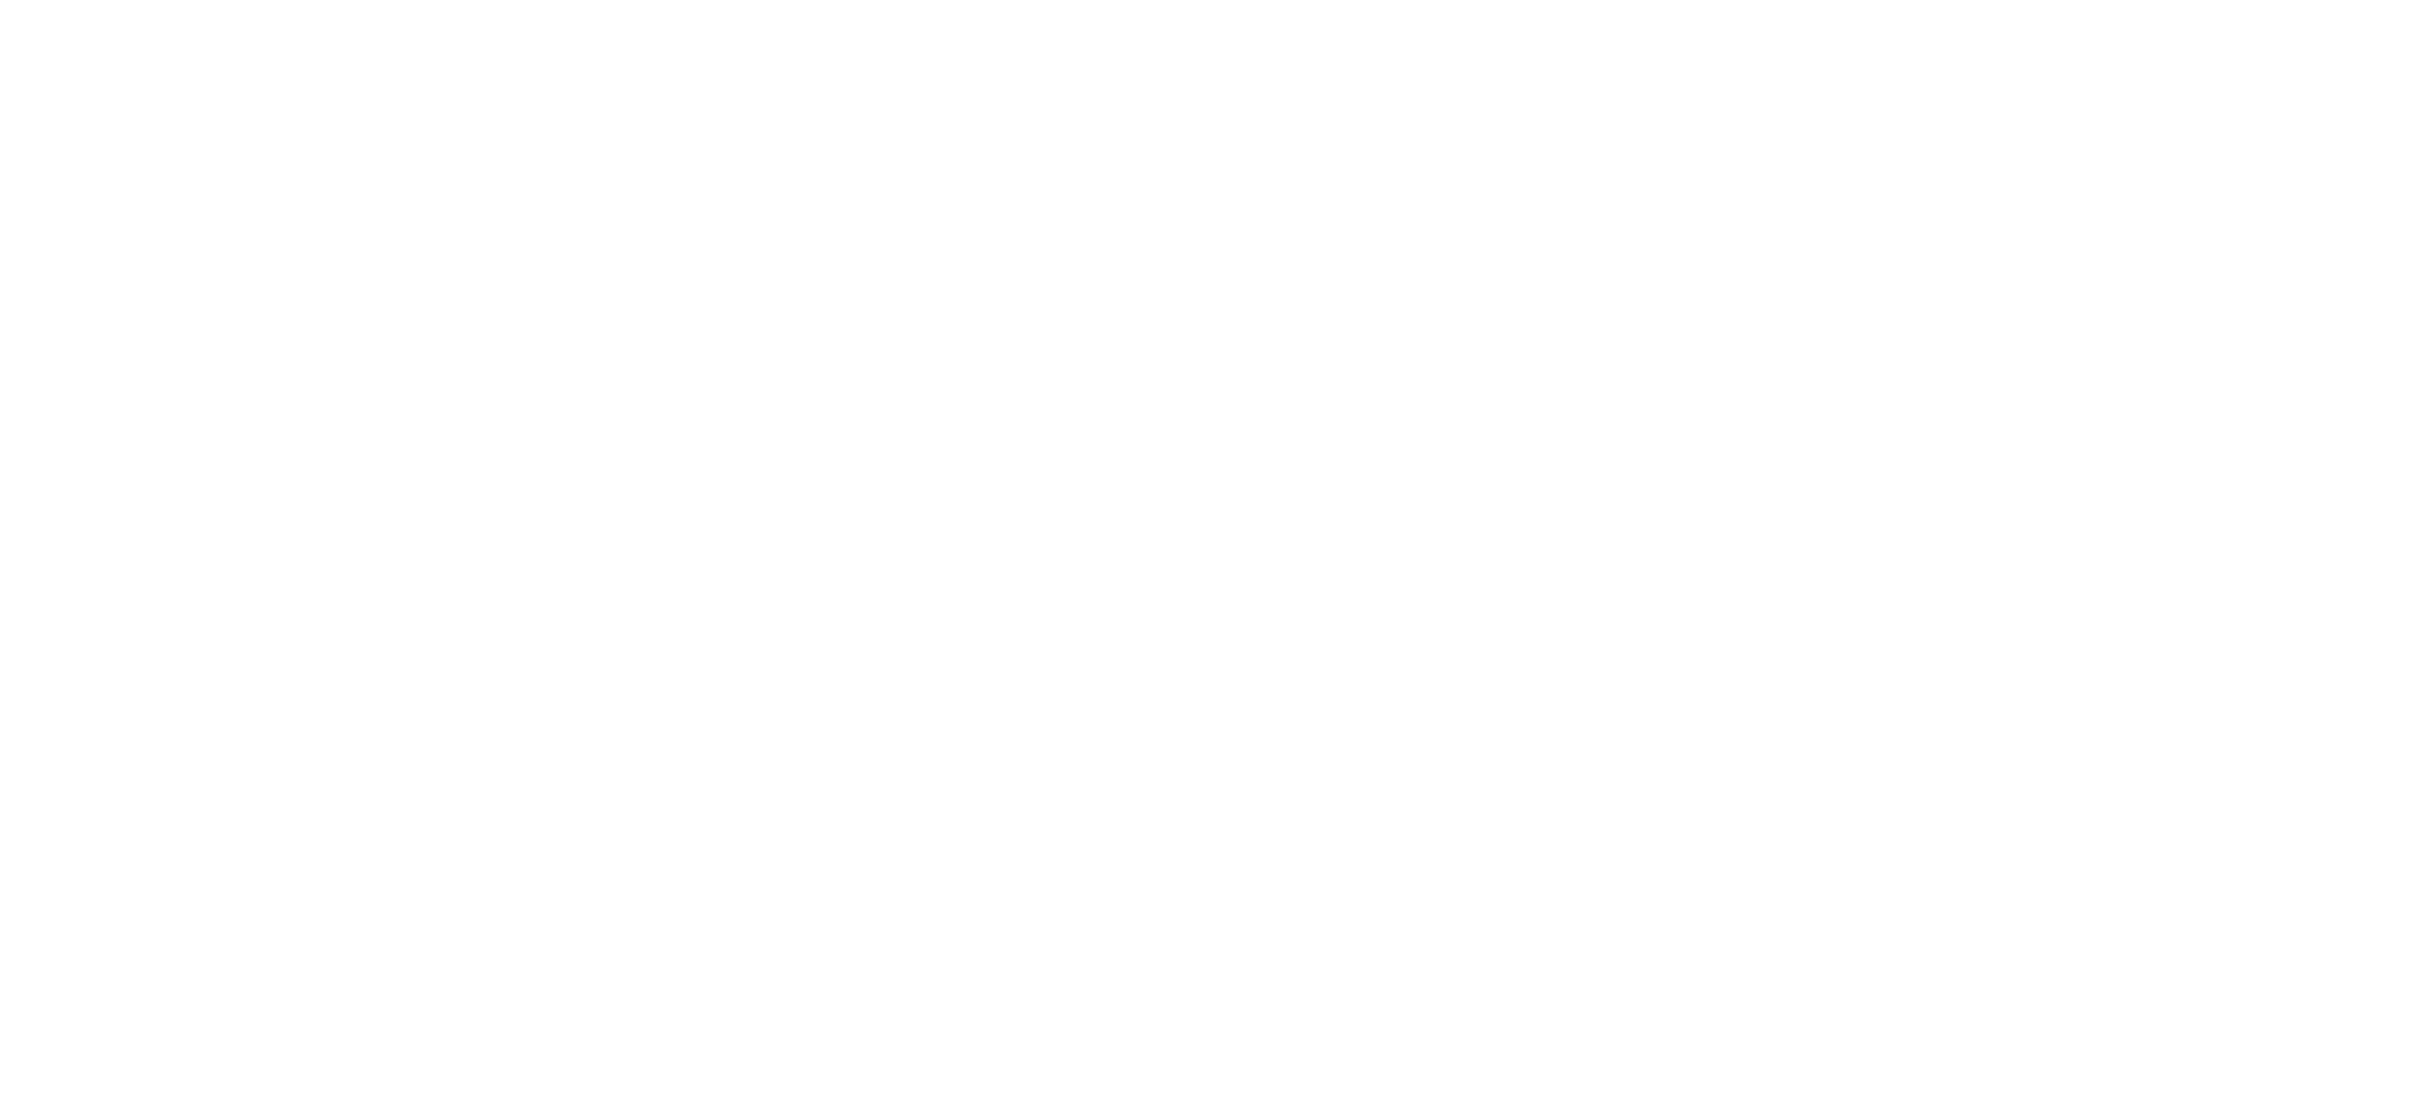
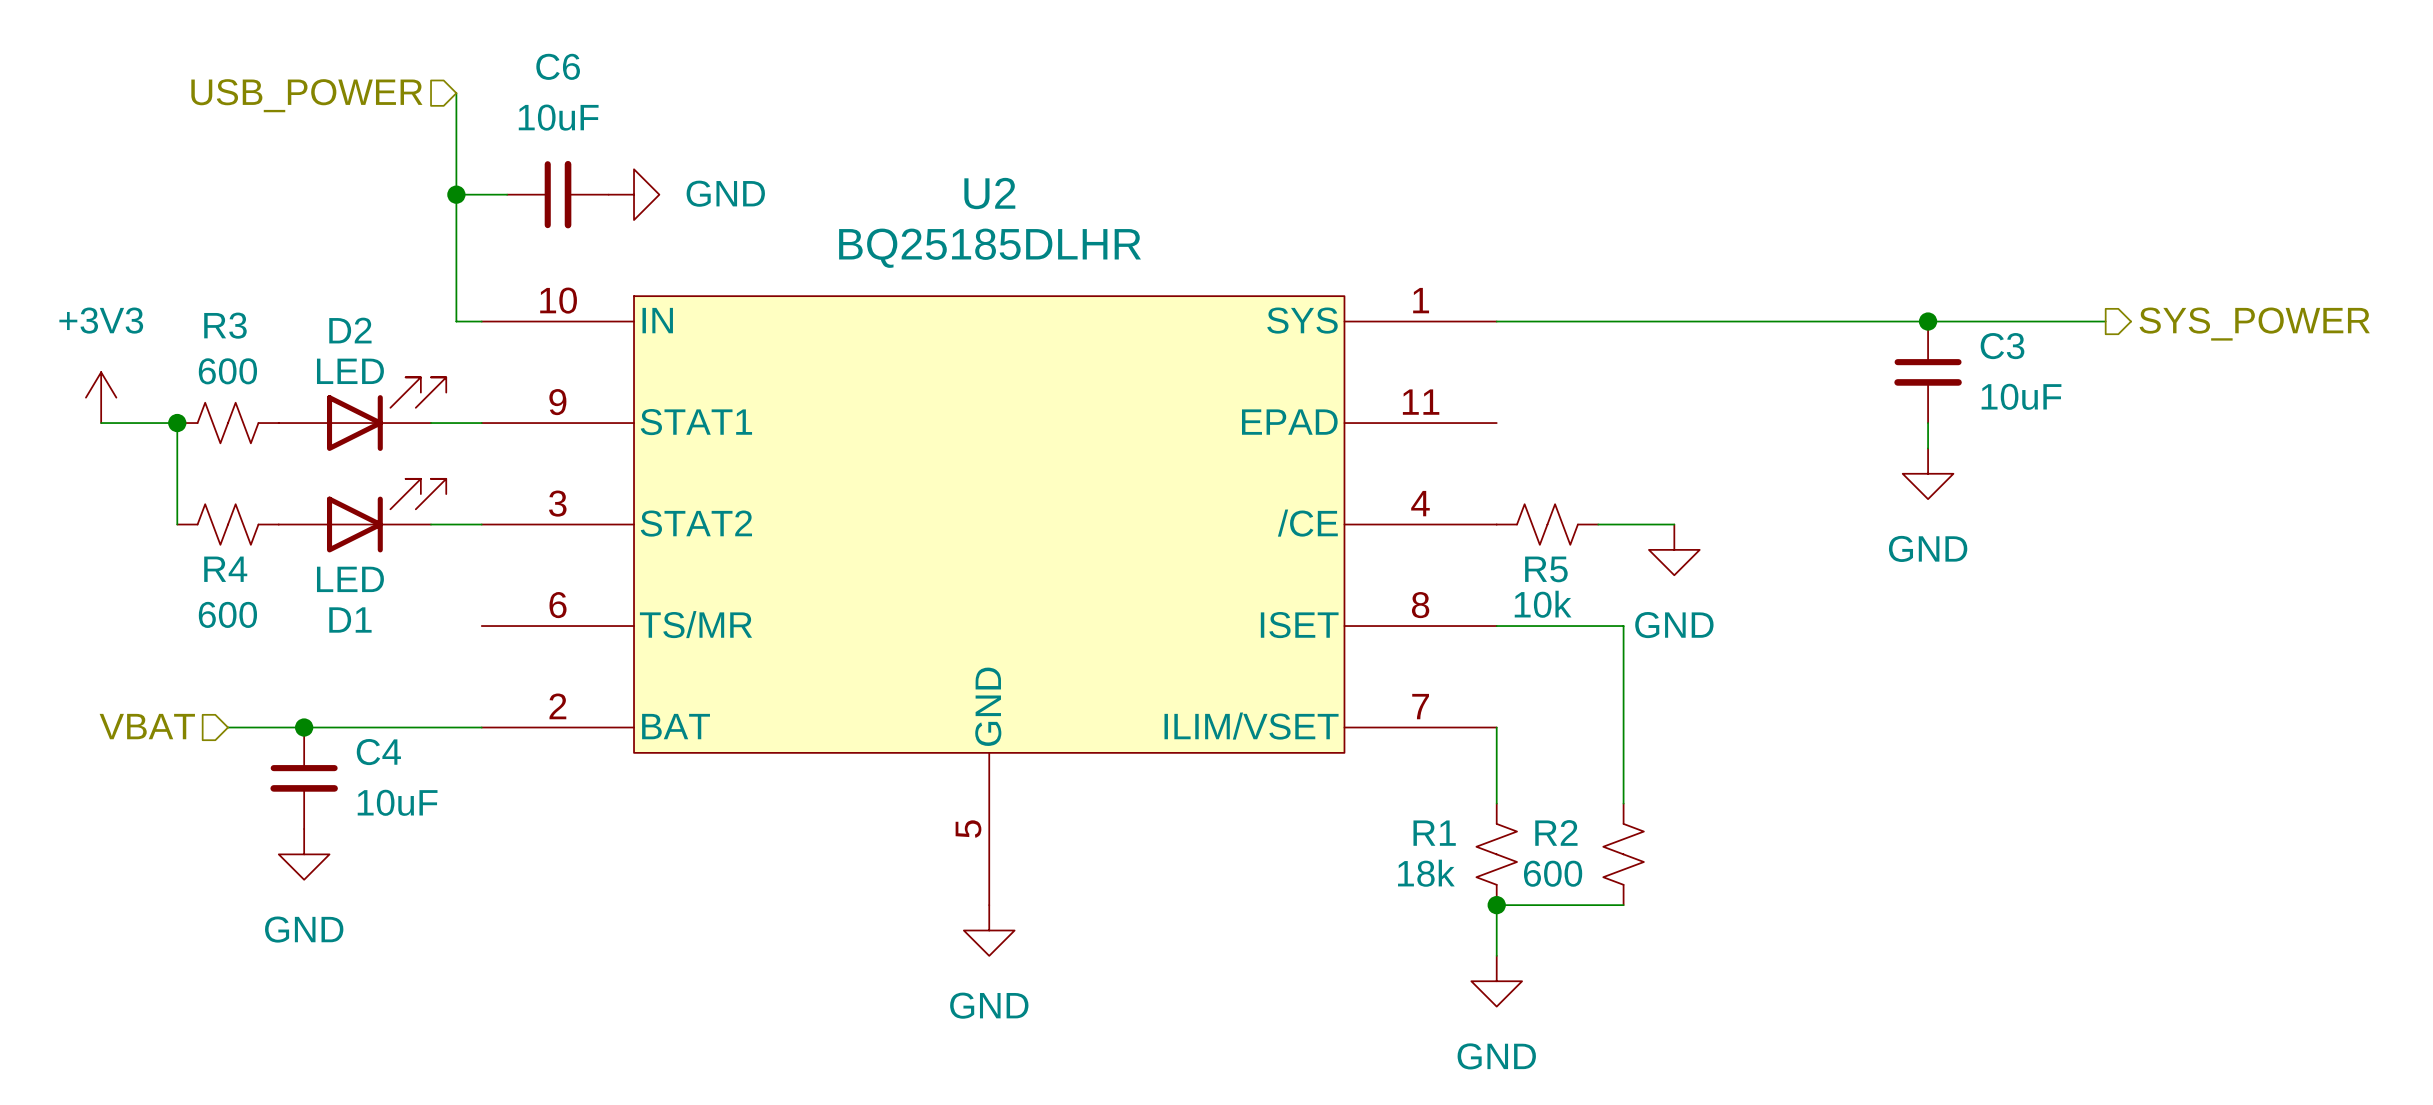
hierarchical label: none -> USB_POWER (306, 95)
wire: none -> (456, 93) (456, 321) (481, 321)
wire: none -> (456, 194) (507, 194)
junction: none -> (456, 194)
C6: none -> 10uF (557, 194)
power symbol: none -> GND (634, 194)
hierarchical label: none -> SYS_POWER (2254, 324)
wire: none -> (1496, 321) (2105, 321)
junction: none -> (1928, 321)
C3: none -> 10uF (1928, 372)
power symbol: none -> +3V3 (101, 397)
D2: none -> LED (362, 414)
wire: none -> (101, 423) (177, 423) (177, 524)
junction: none -> (177, 423)
R3: none -> 600 (228, 423)
wire: none -> (431, 423) (481, 423)
wire: none -> (1928, 423) (1928, 448)
power symbol: none -> GND (1928, 473)
D1: none -> LED (362, 515)
R4: none -> 600 (228, 524)
wire: none -> (431, 524) (481, 524)
R5: none -> 10k (1547, 524)
wire: none -> (1598, 524) (1674, 524)
power symbol: none -> GND (1674, 549)
U2: none -> BQ25185DLHR (989, 600)
wire: none -> (1496, 626) (1623, 626) (1623, 803)
hierarchical label: none -> VBAT (147, 726)
wire: none -> (228, 727) (481, 727)
junction: none -> (304, 727)
wire: none -> (1496, 727) (1496, 803)
C4: none -> 10uF (304, 778)
power symbol: none -> GND (304, 854)
R1: none -> 18k (1496, 854)
R2: none -> 600 (1623, 854)
junction: none -> (1496, 905)
wire: none -> (1623, 905) (1496, 905) (1496, 955)
power symbol: none -> GND (989, 930)
power symbol: none -> GND (1496, 981)

